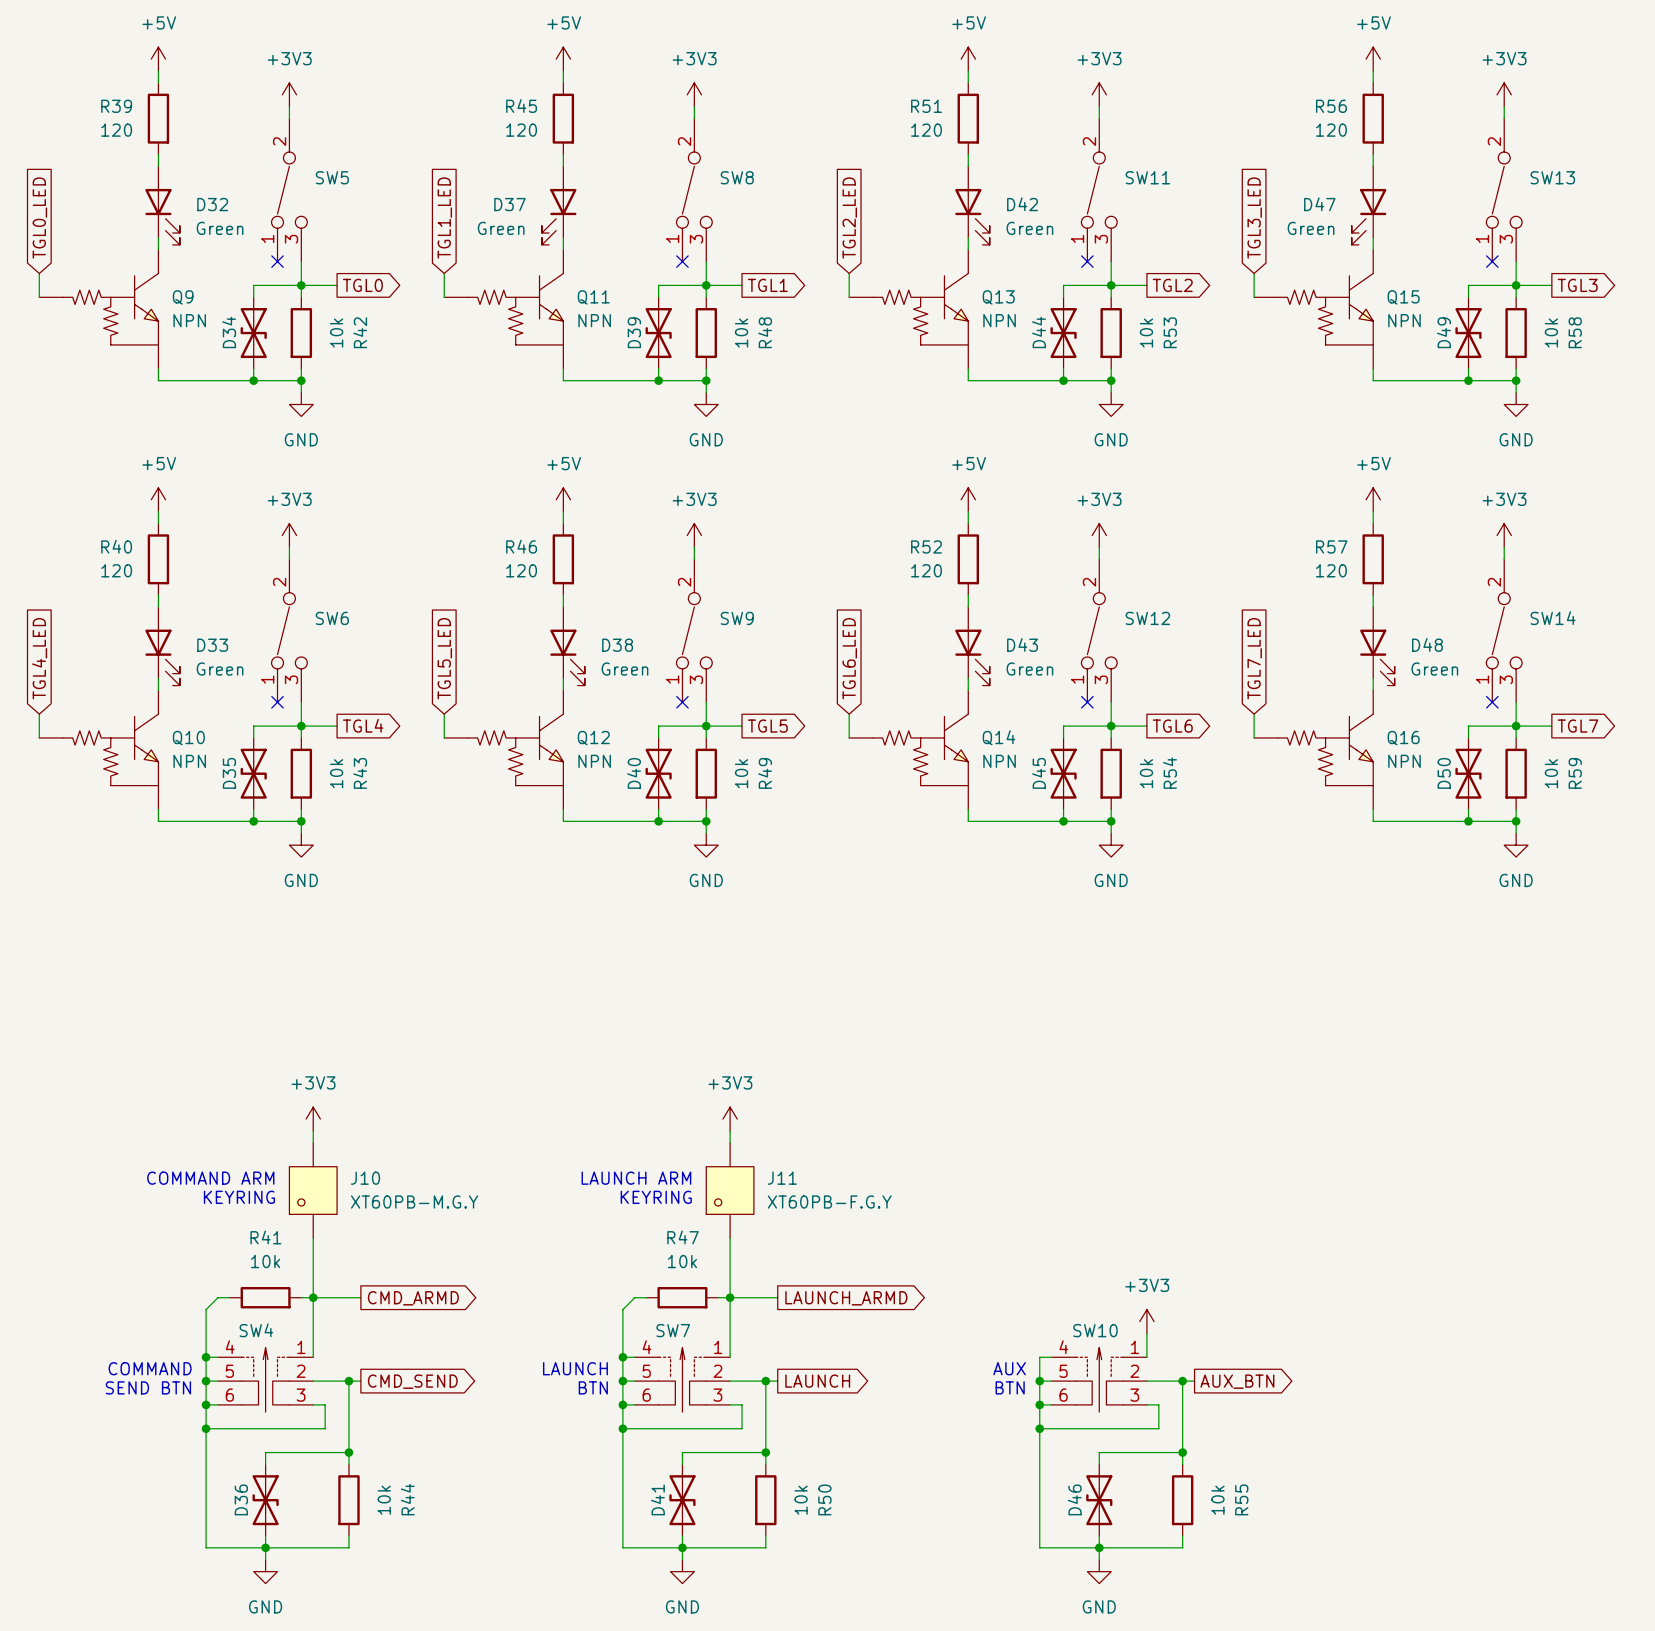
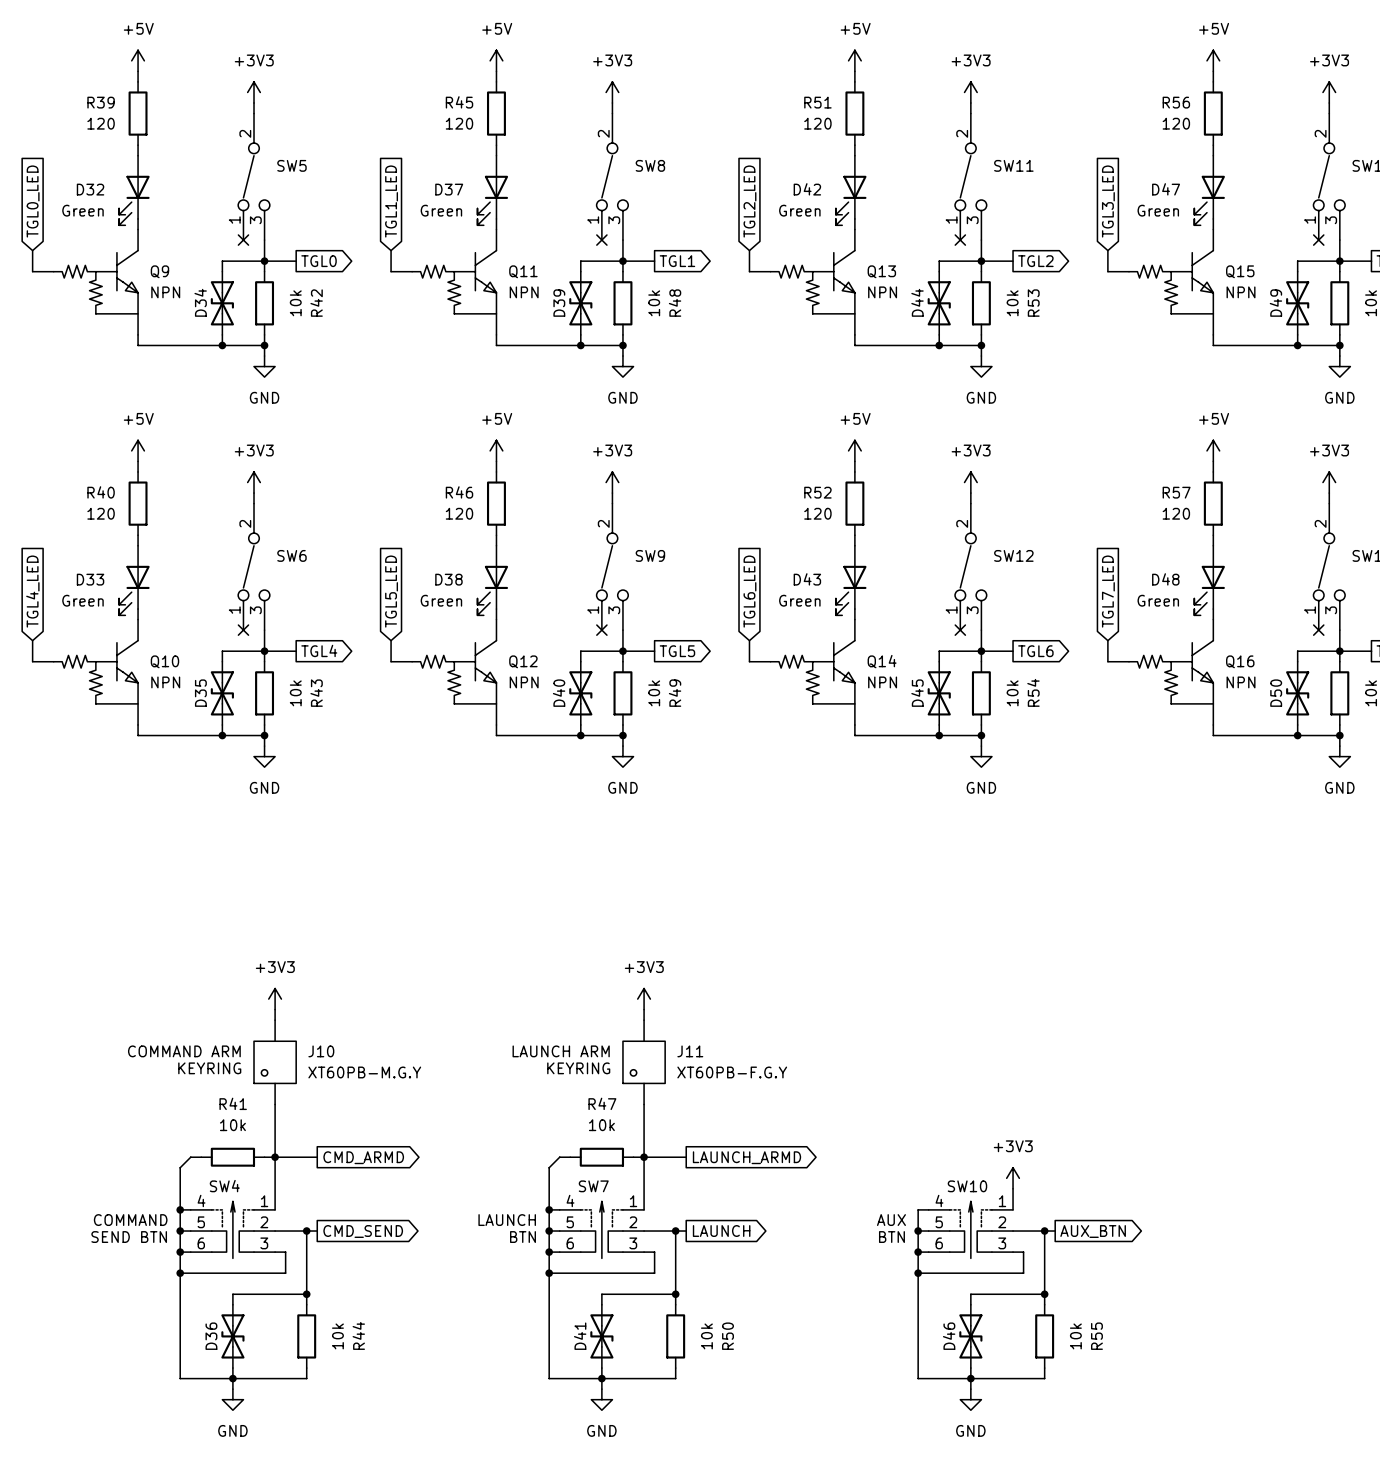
D32 flip: as is (162, 216) -> left-right (134, 200)
D42 flip: as is (972, 216) -> left-right (851, 200)
D33 flip: as is (162, 657) -> left-right (134, 590)
D38 flip: as is (567, 657) -> left-right (492, 590)
D43 flip: as is (972, 657) -> left-right (851, 590)
D48 flip: as is (1377, 657) -> left-right (1209, 590)

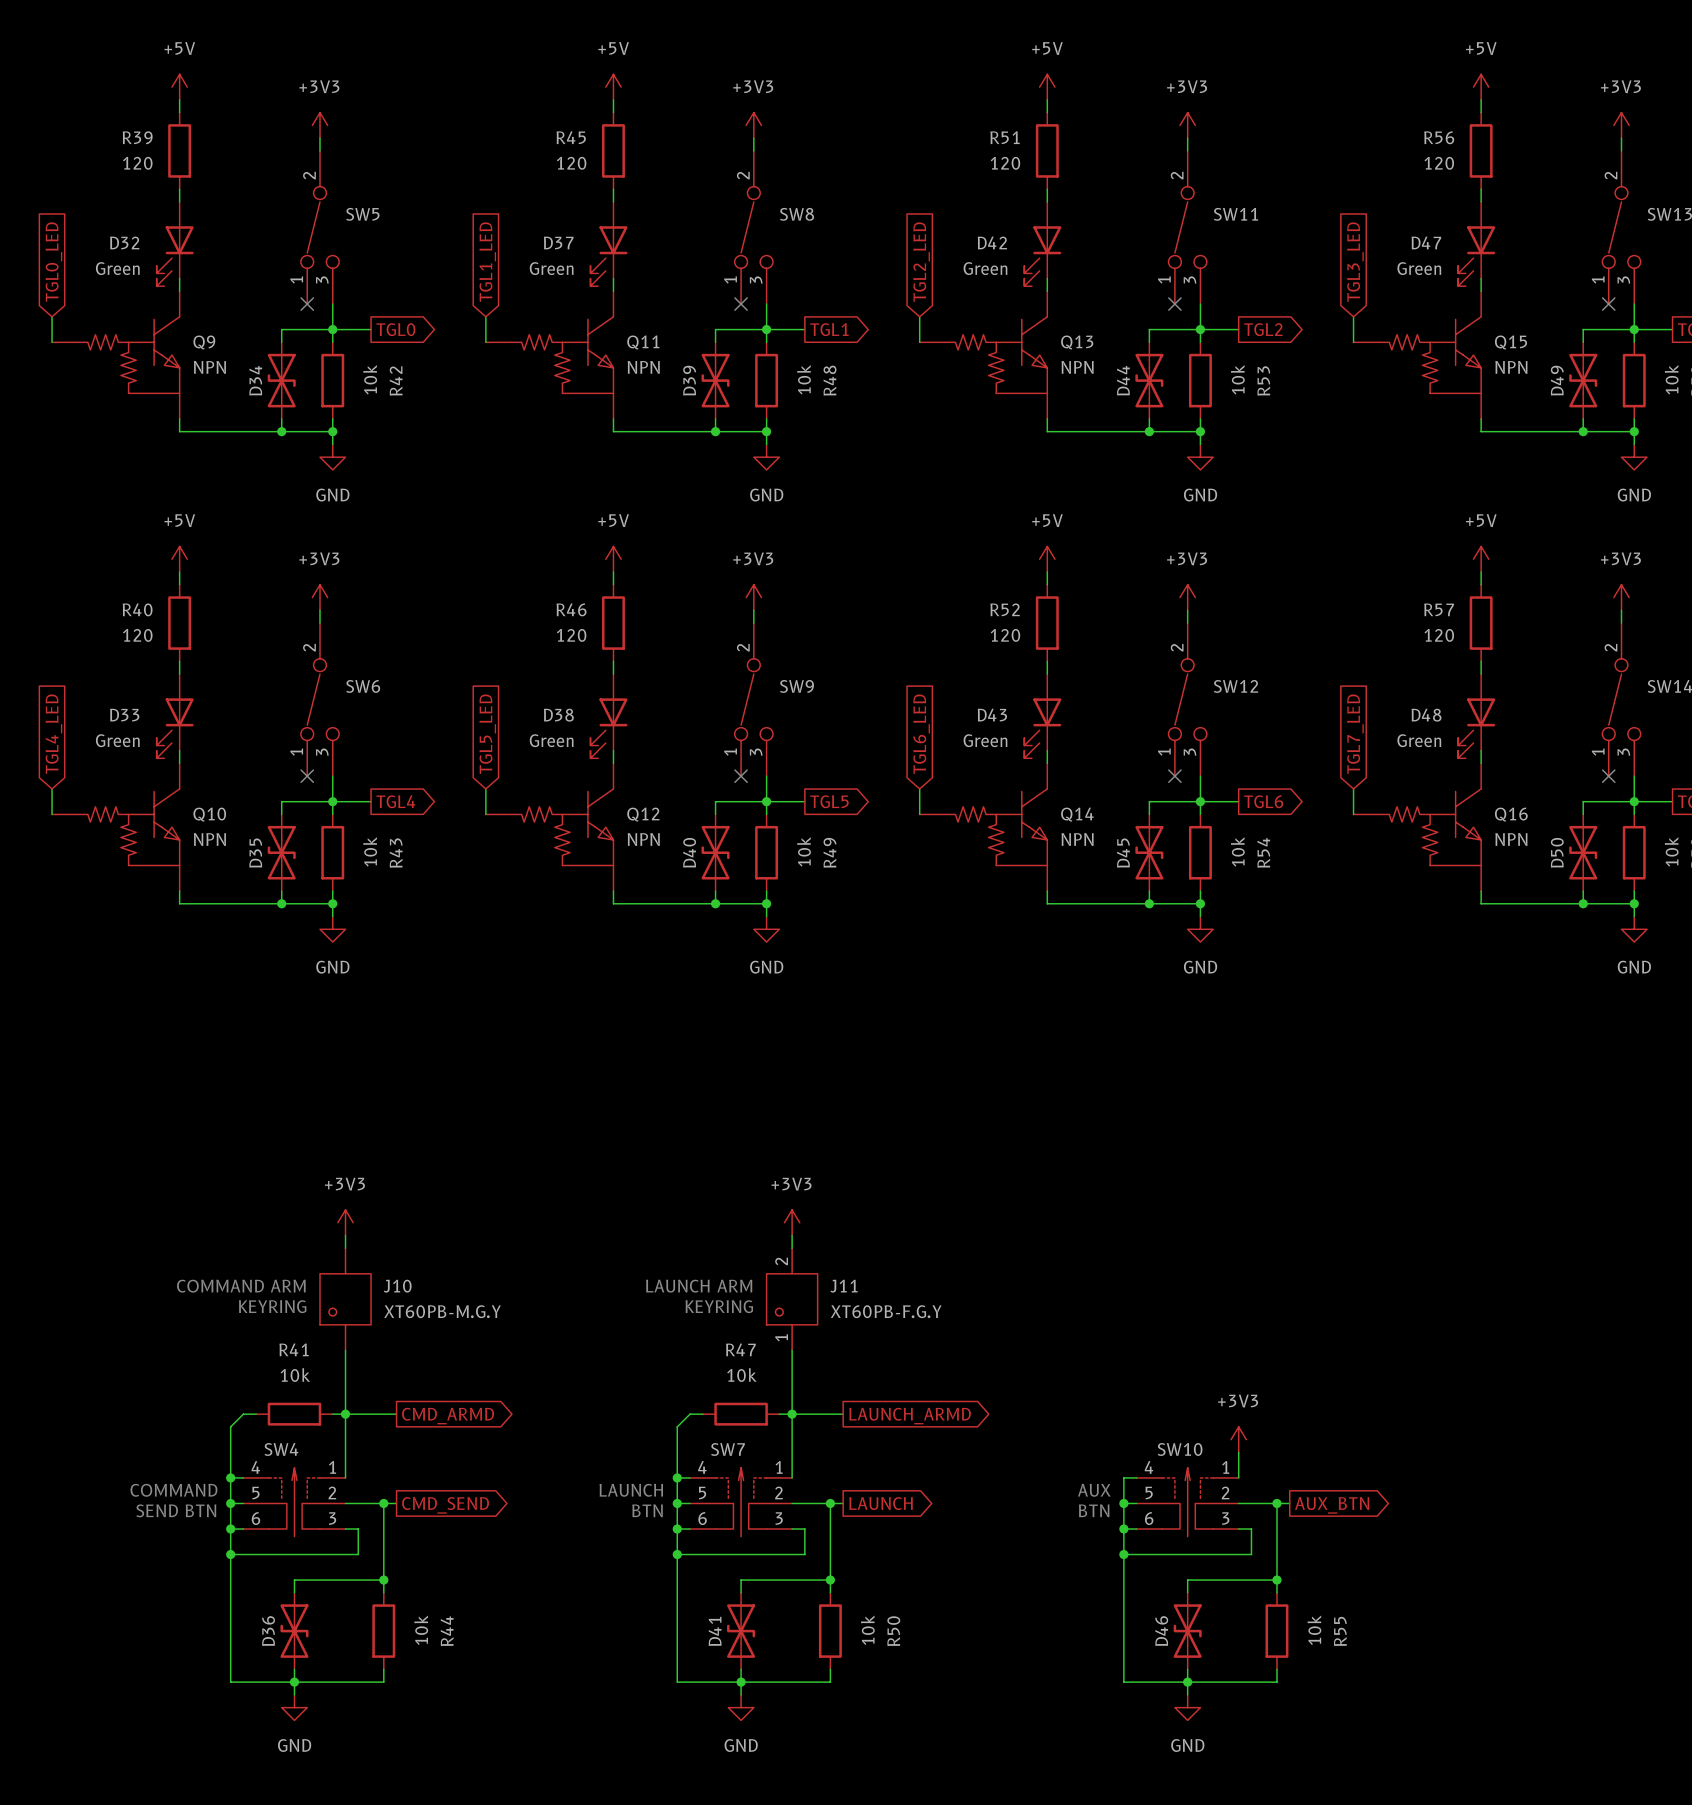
J11 pin number: none -> 2 (781, 1261)
J11 pin number: none -> 1 (781, 1337)

